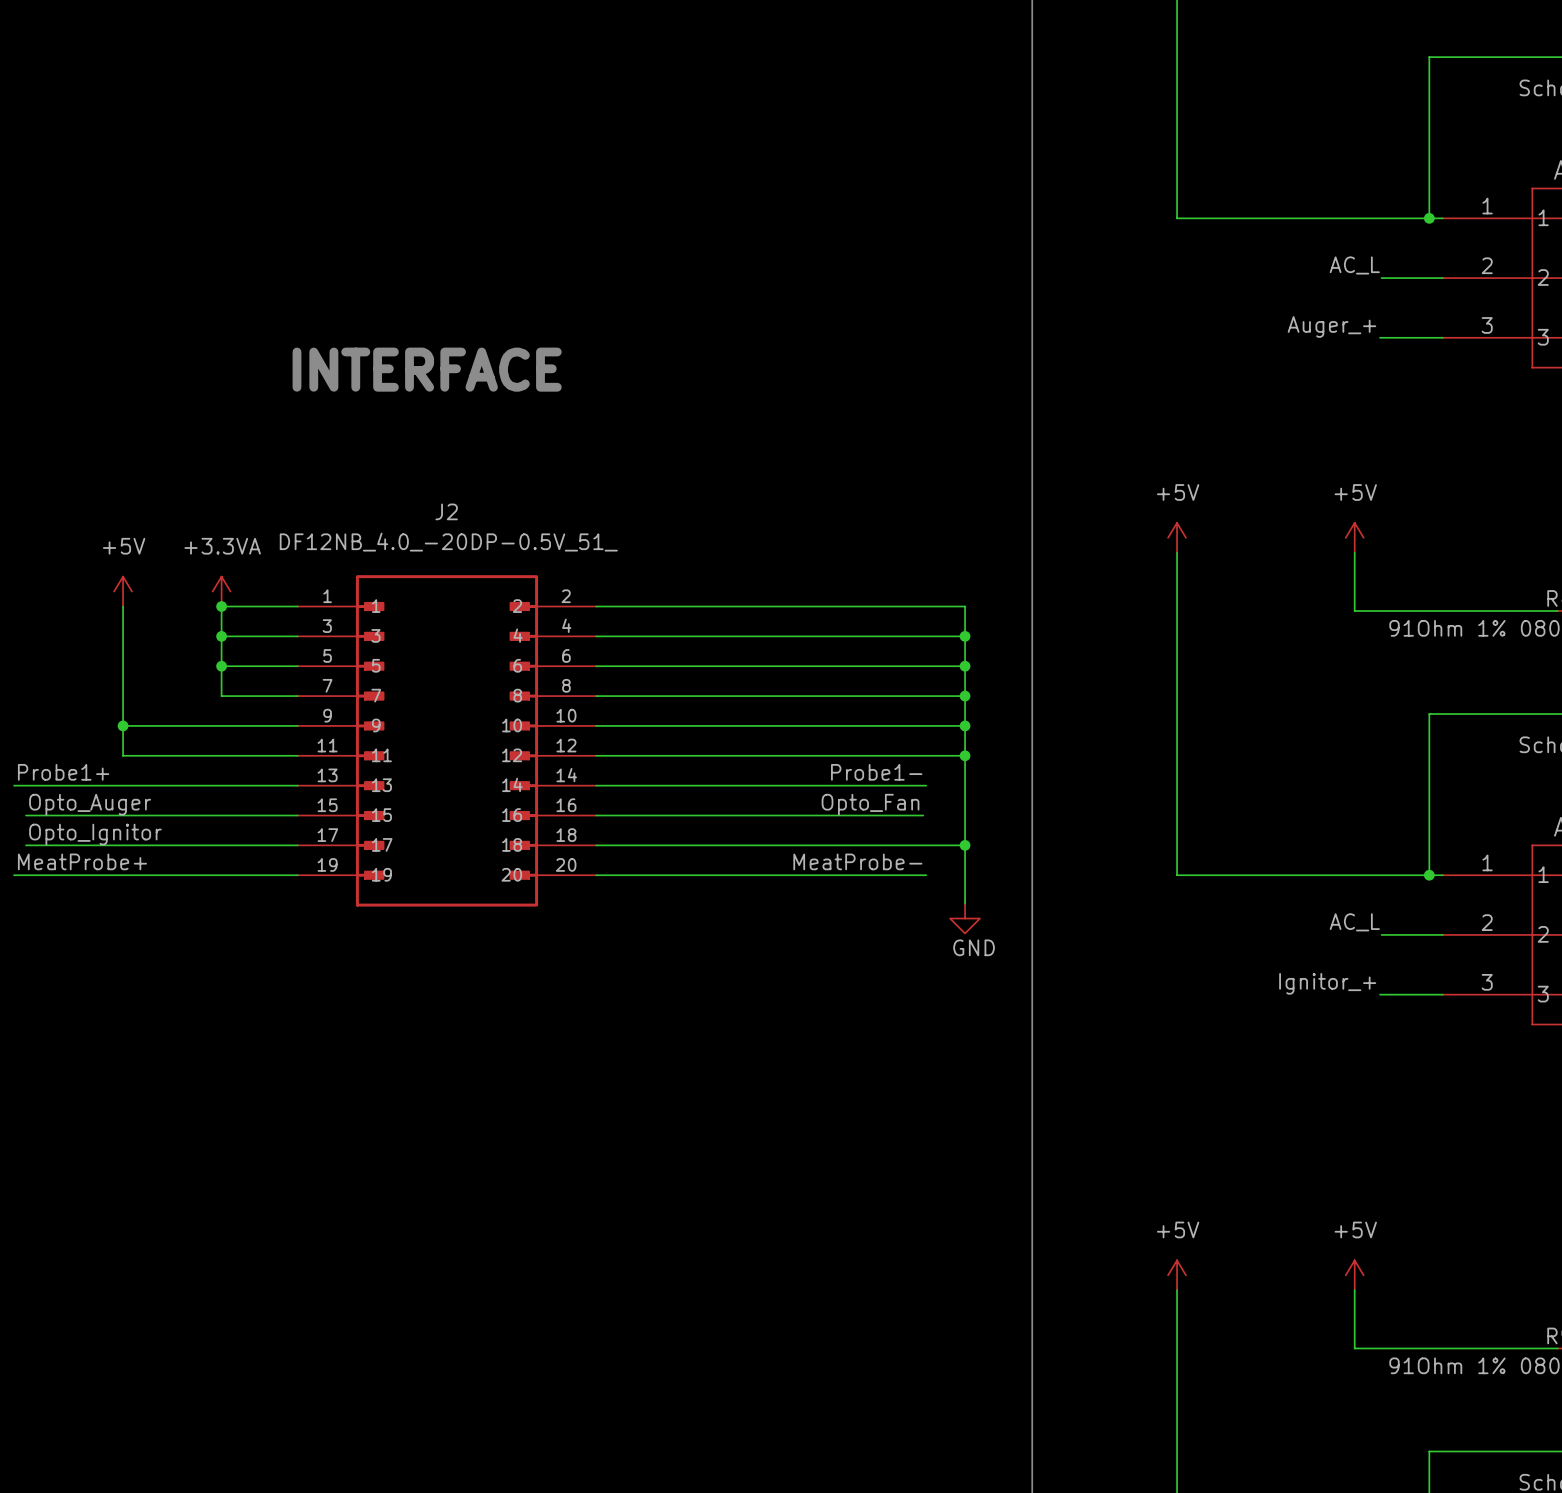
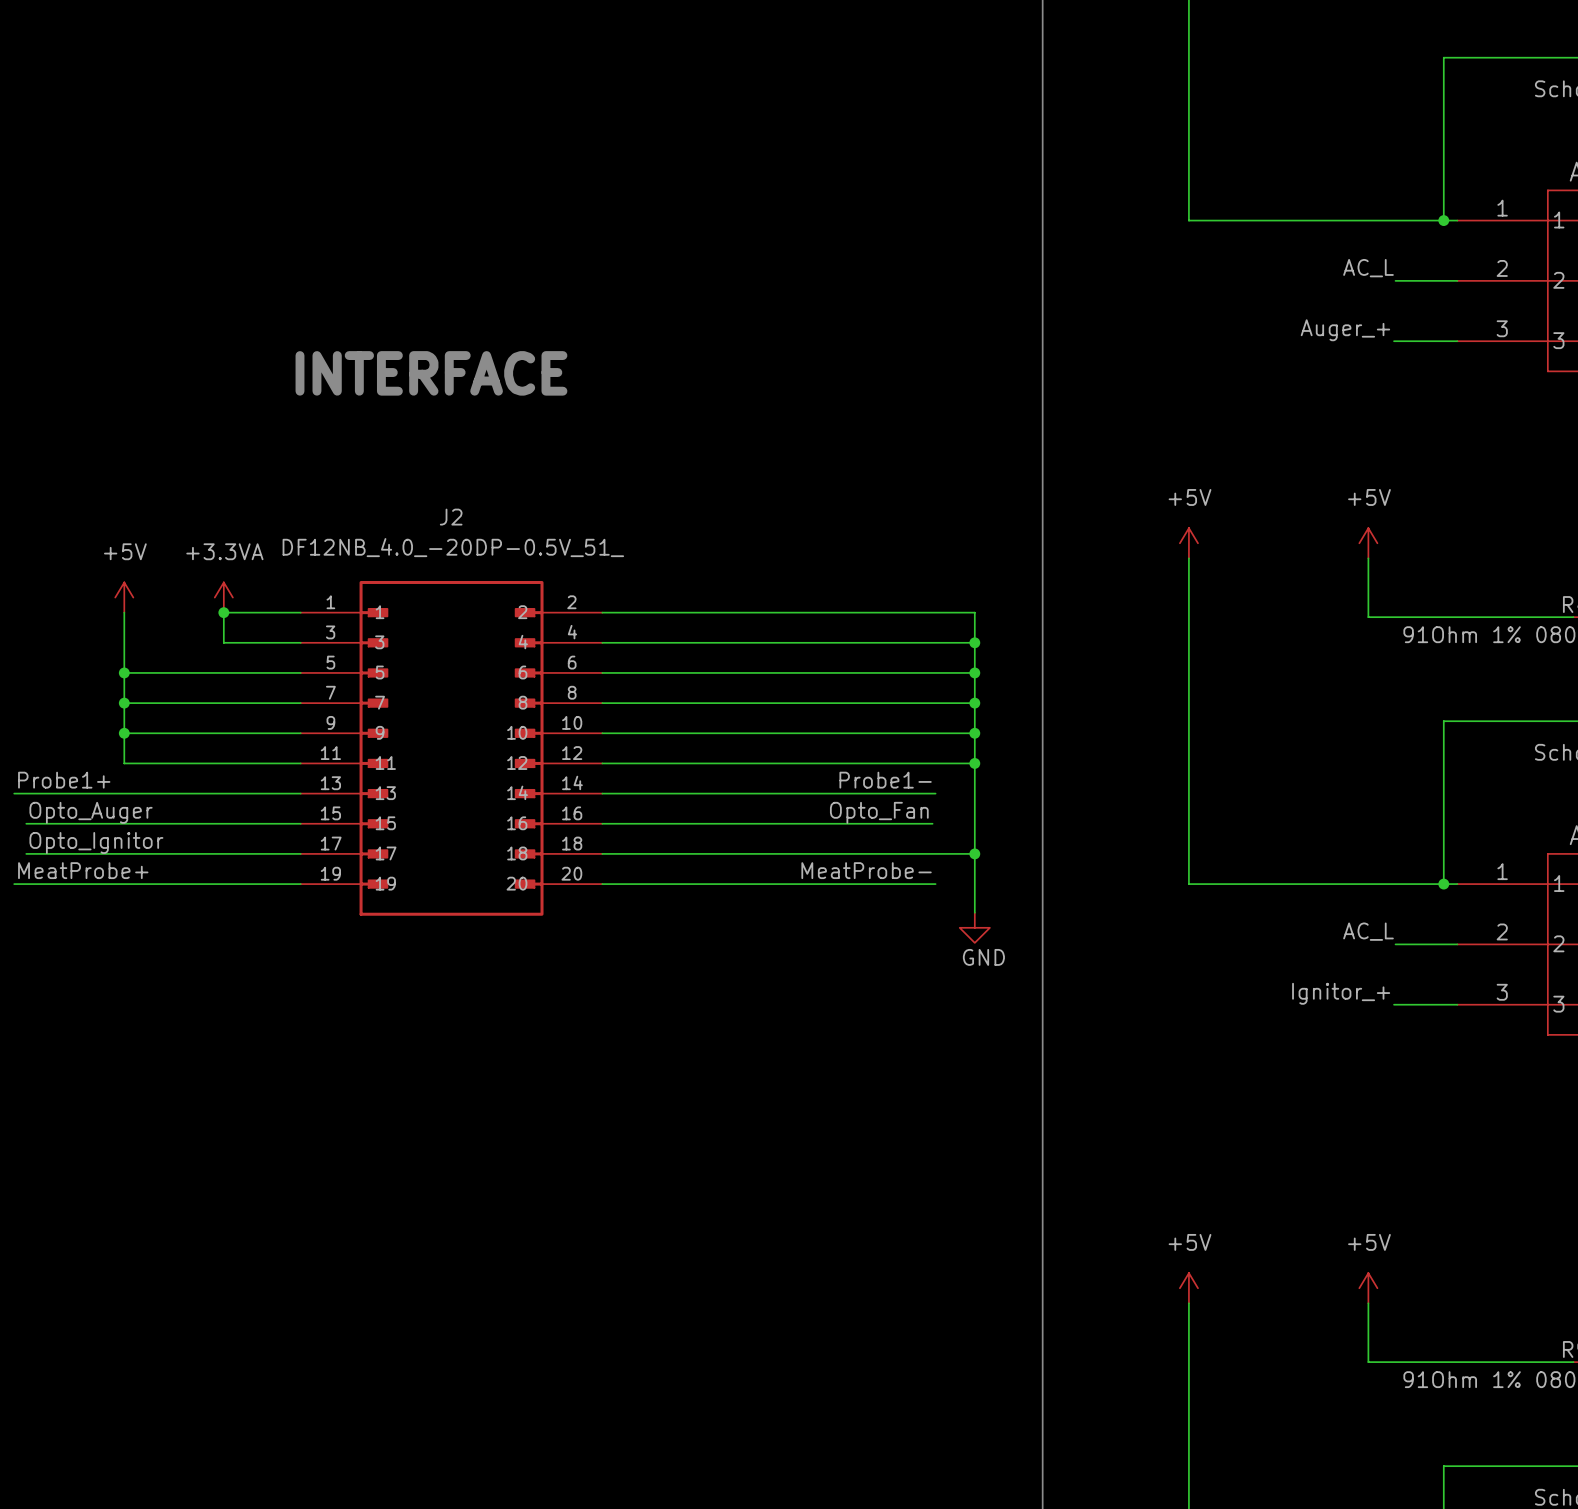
wire: (221, 636) (221, 696) -> (124, 703) (223, 703)
junction: (221, 636) -> none
wire: none -> (124, 672) (223, 672)
junction: none -> (124, 672)
junction: (221, 666) -> none
junction: none -> (124, 703)

